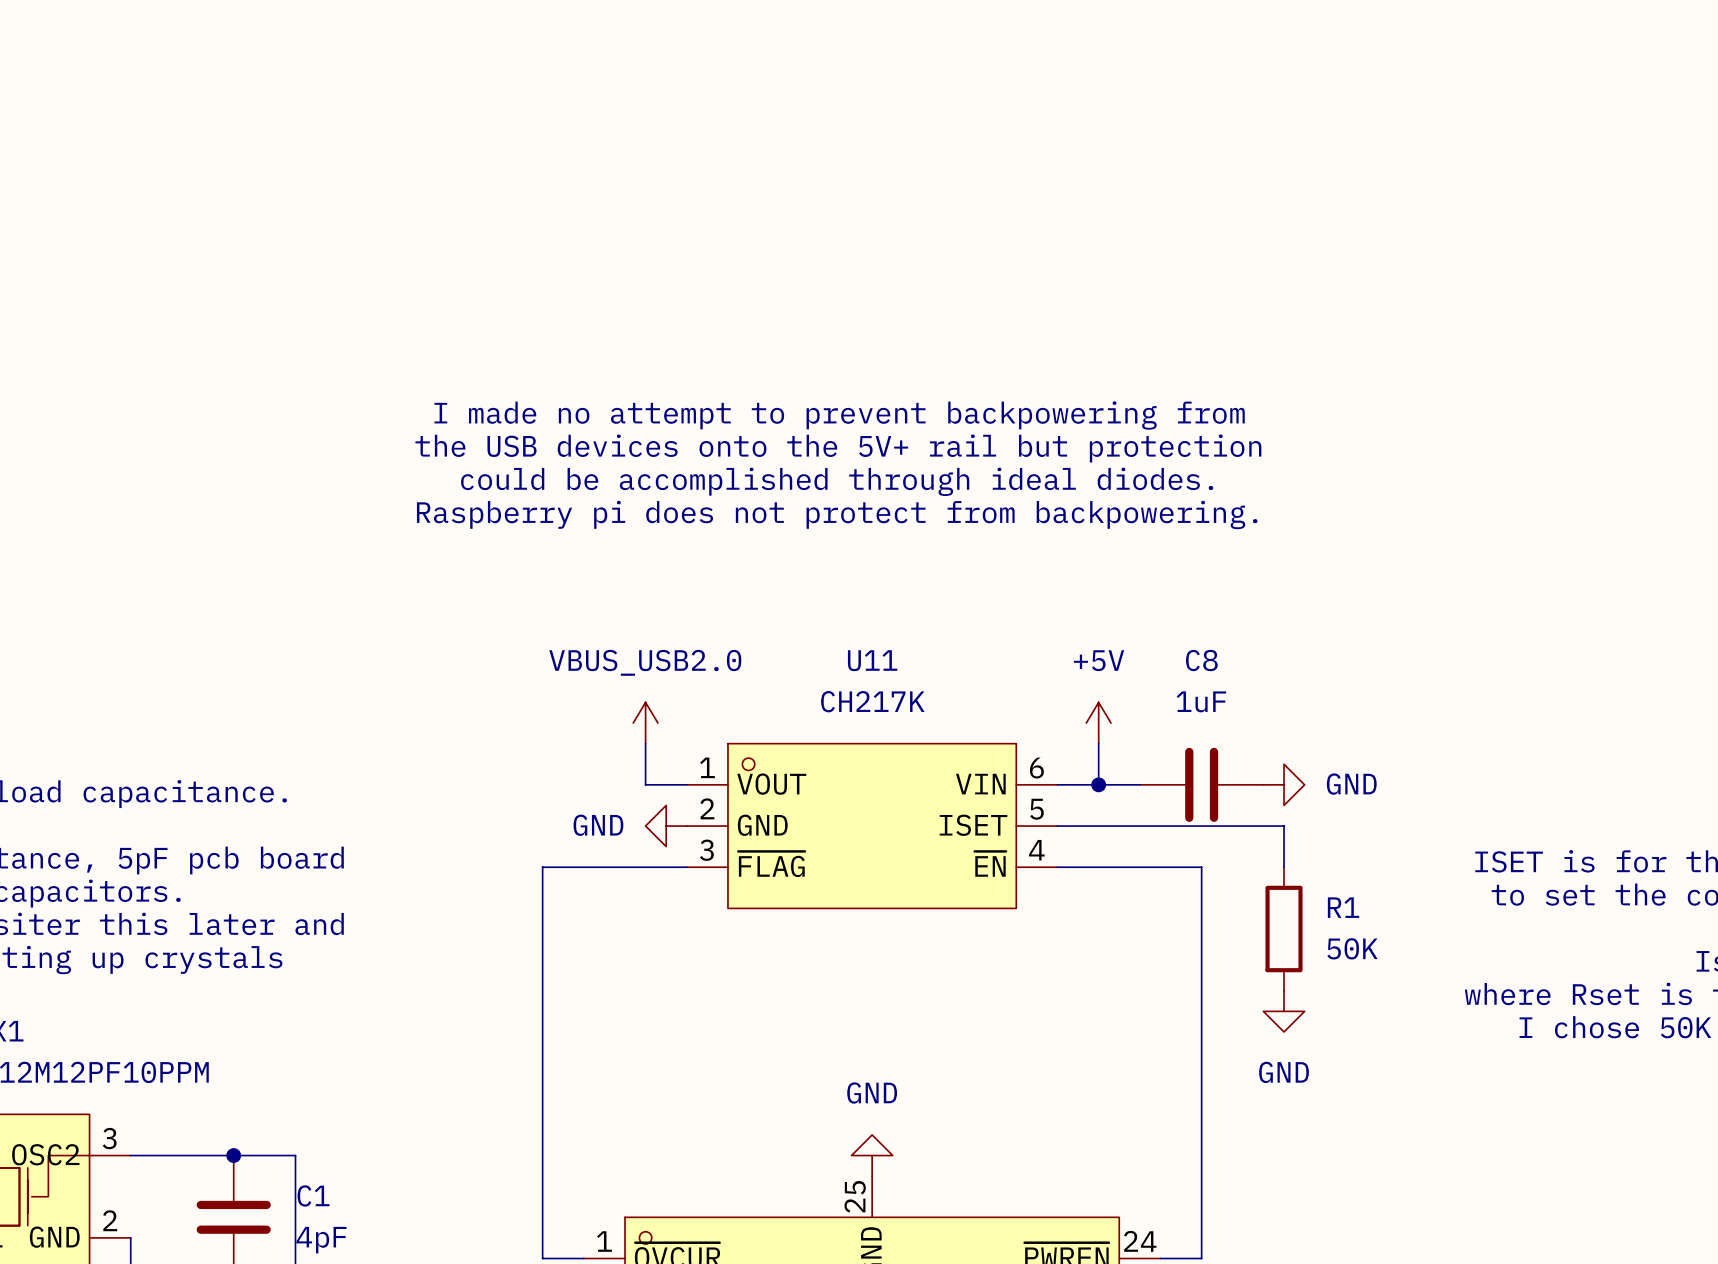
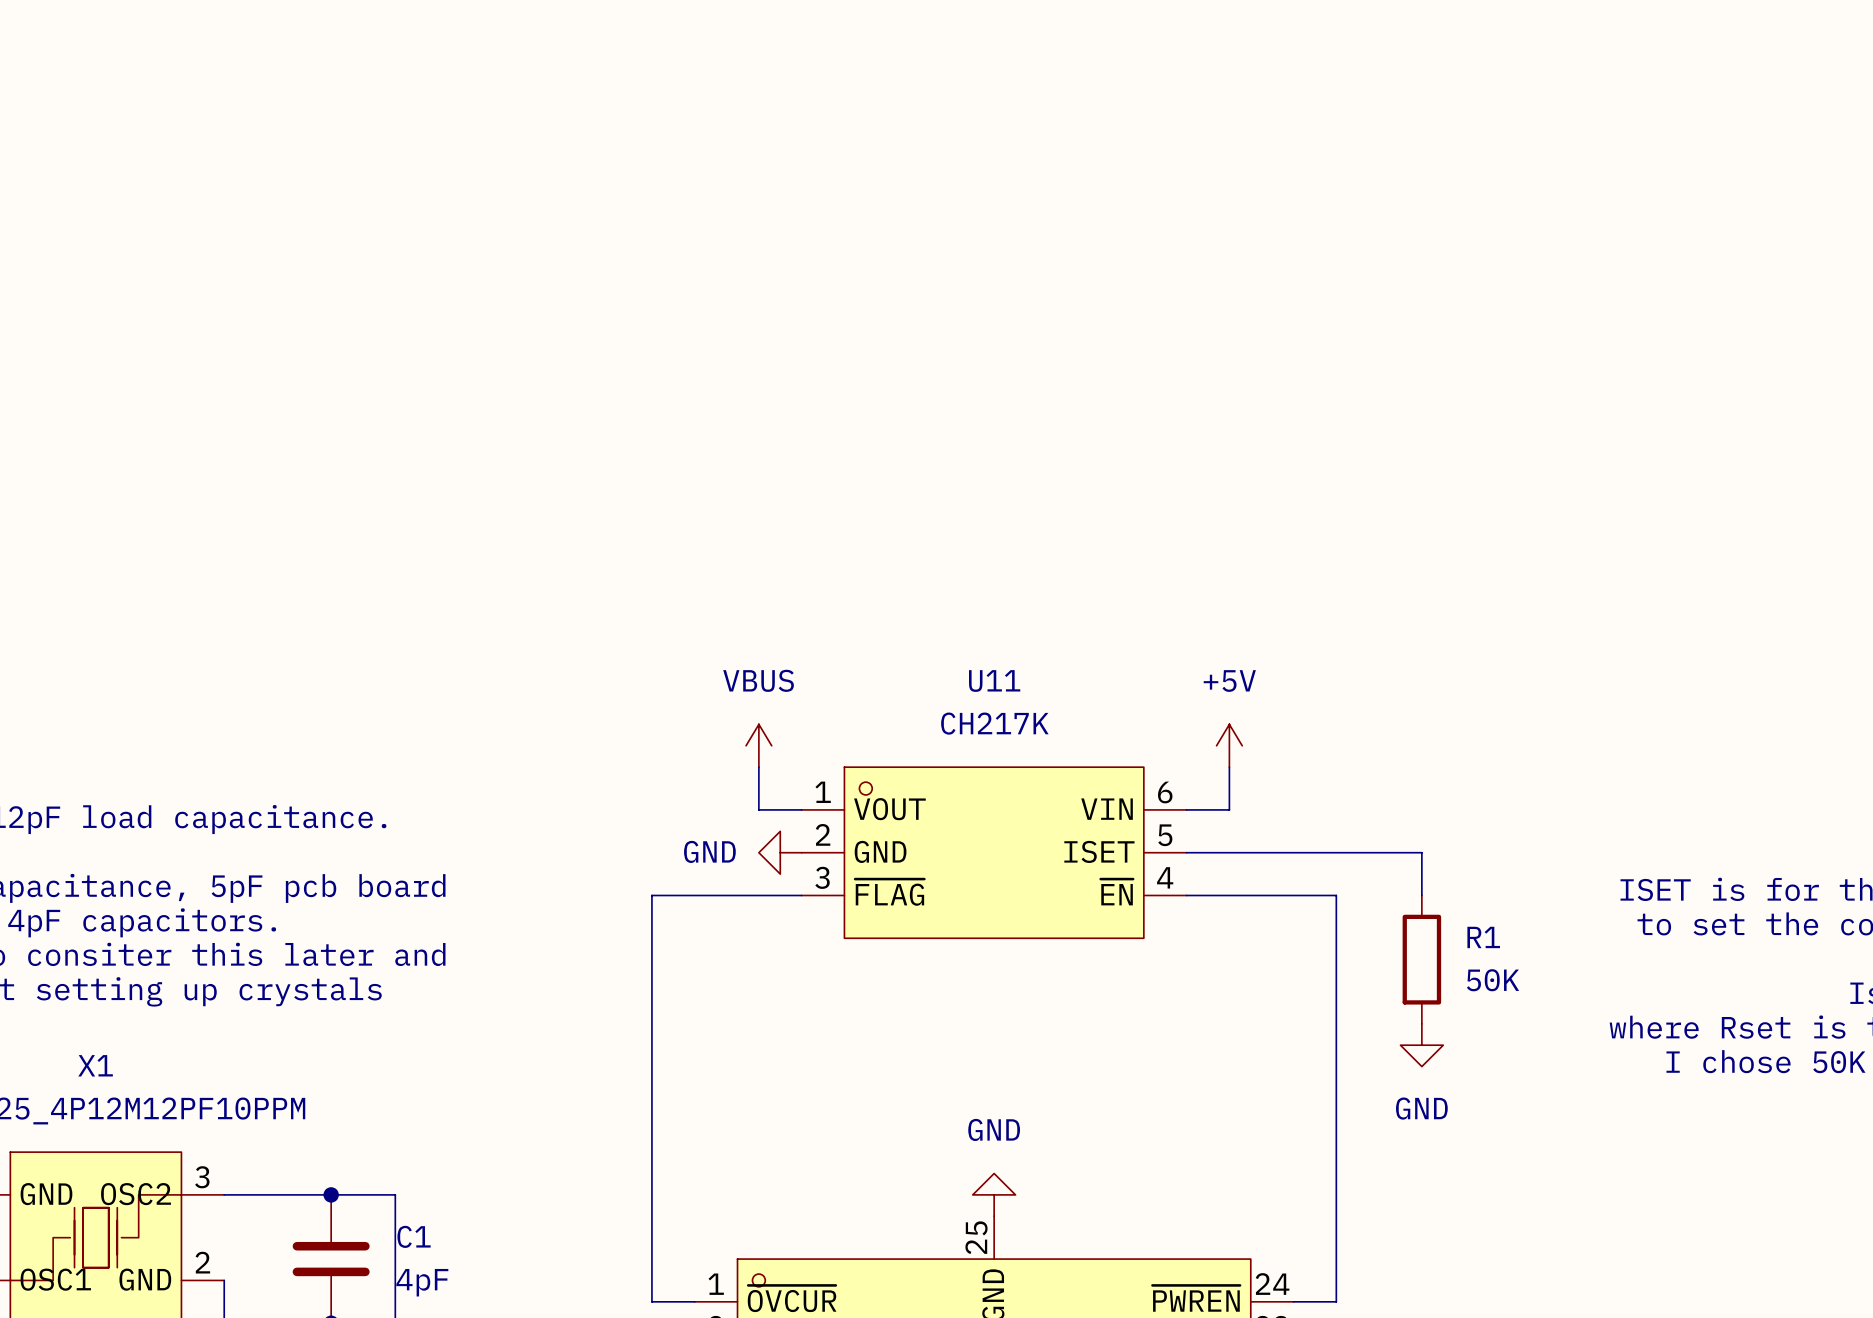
text: I made no attempt to prevent backpowering from (839, 415) -> none
text: the USB devices onto the 5V+ rail but protection (838, 448) -> none
text: could be accomplished through ideal diodes. (837, 481) -> none
text: Raspberry pi does not protect from backpowering. (837, 515) -> none
power symbol: VBUS_USB2.0 (645, 723) -> VBUS (758, 745)
wire: (1098, 784) (1139, 784) -> none
junction: (1098, 784) -> none
C8: 1uF (1201, 784) -> none
power symbol: GND (1284, 784) -> none

